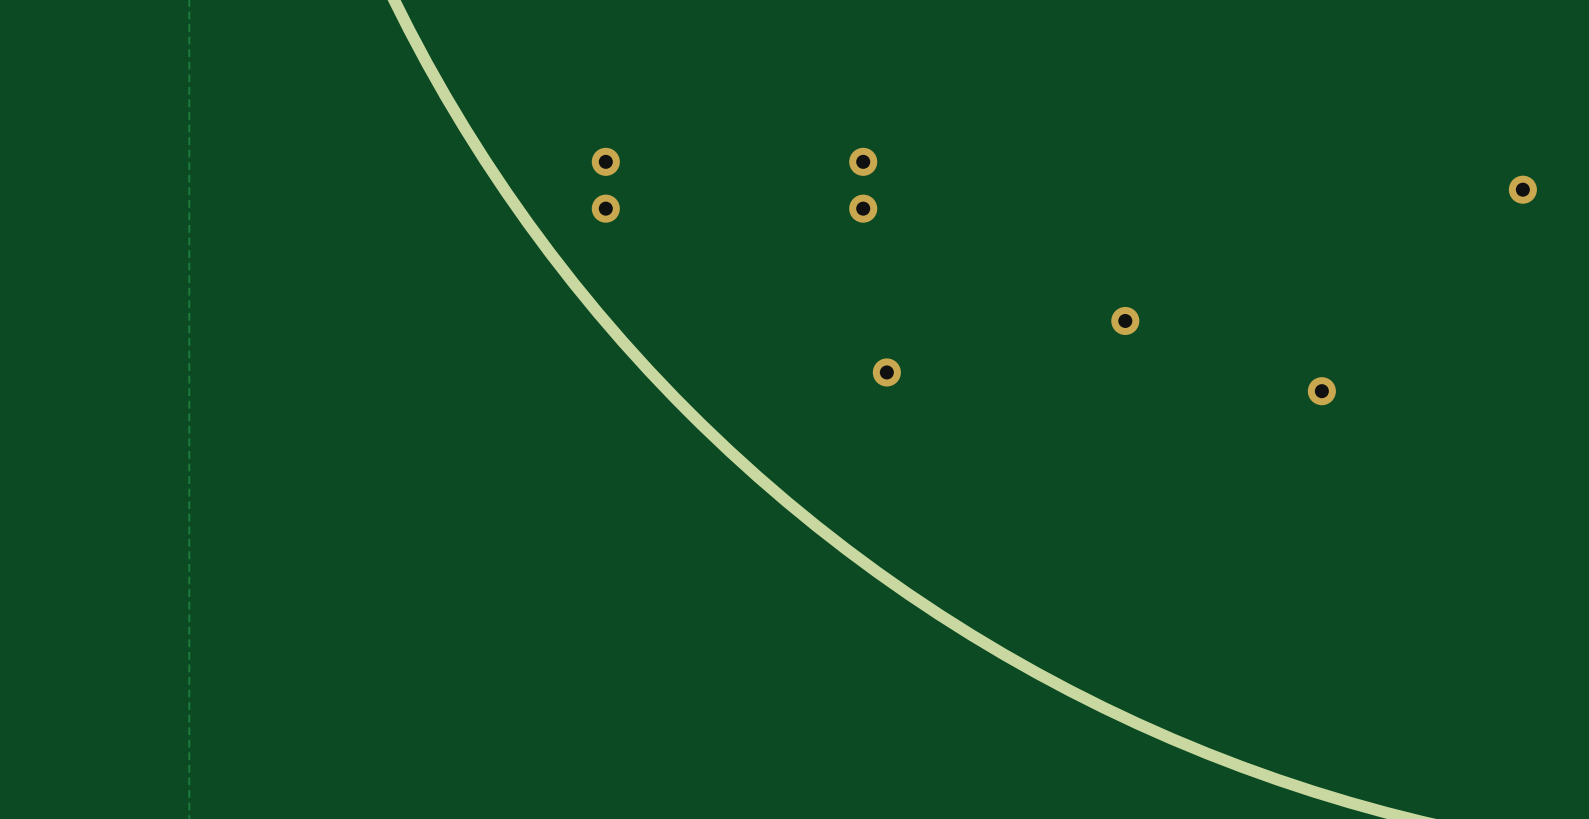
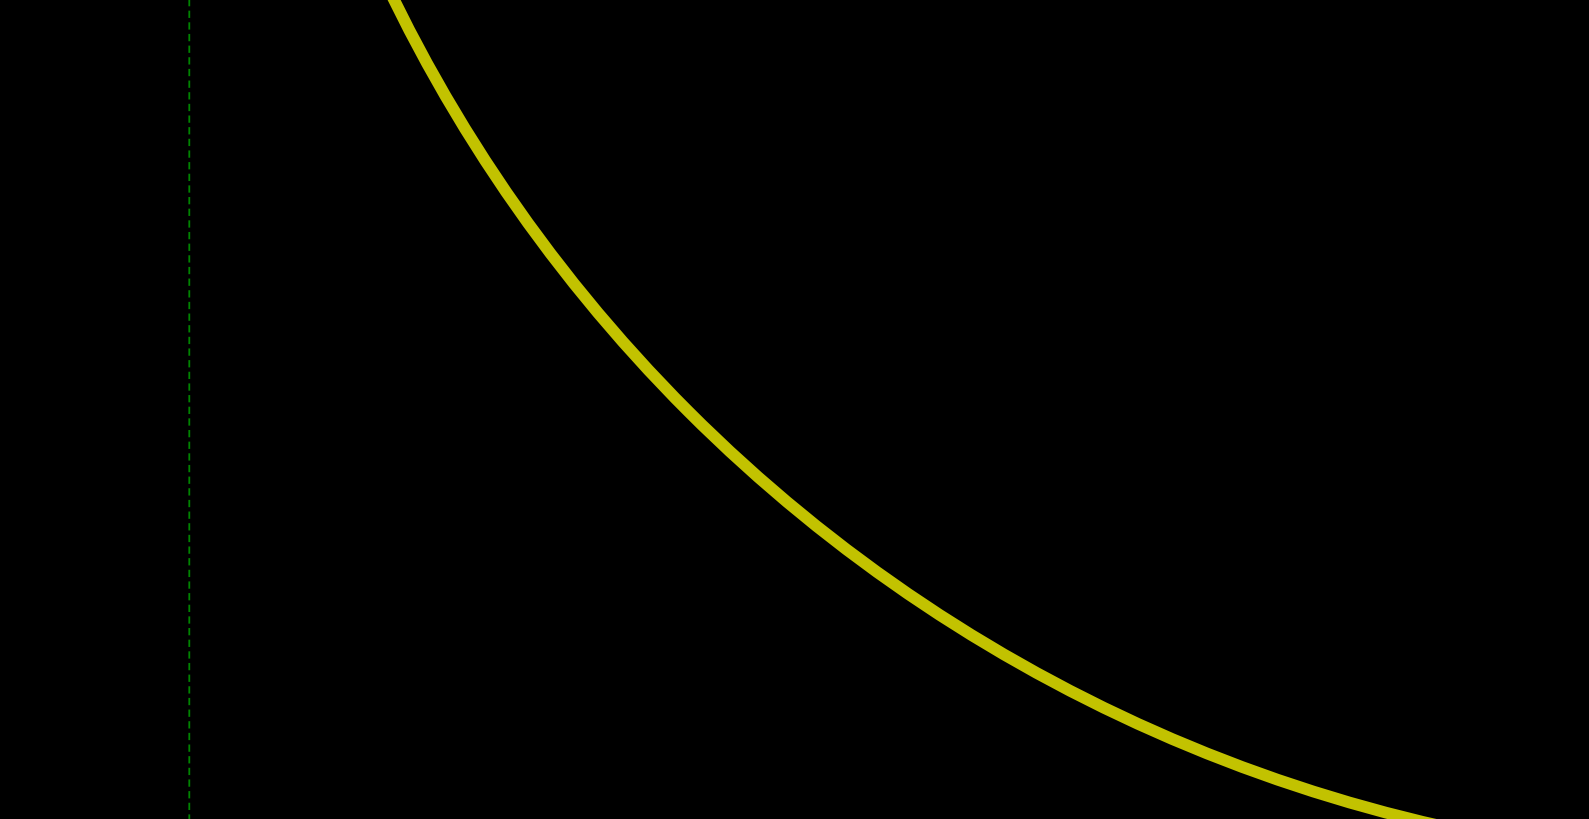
via: (605, 161) -> none
via: (863, 161) -> none
via: (1522, 189) -> none
via: (605, 208) -> none
via: (863, 208) -> none
via: (1125, 320) -> none
via: (886, 372) -> none
via: (1321, 391) -> none

